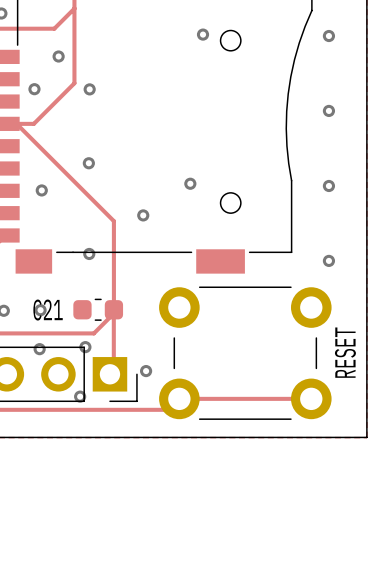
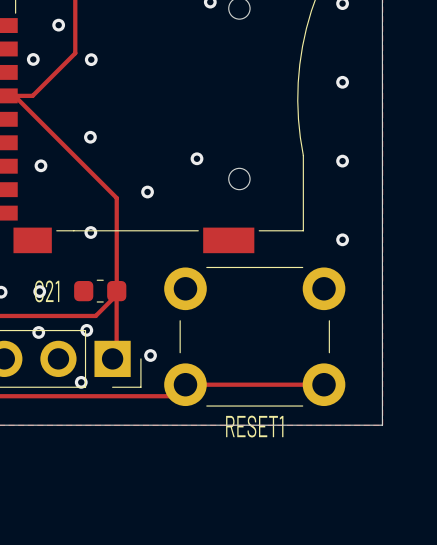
RESET1 value: RESET (345, 352) -> none
RESET1 name: none -> RESET1 (254, 426)

